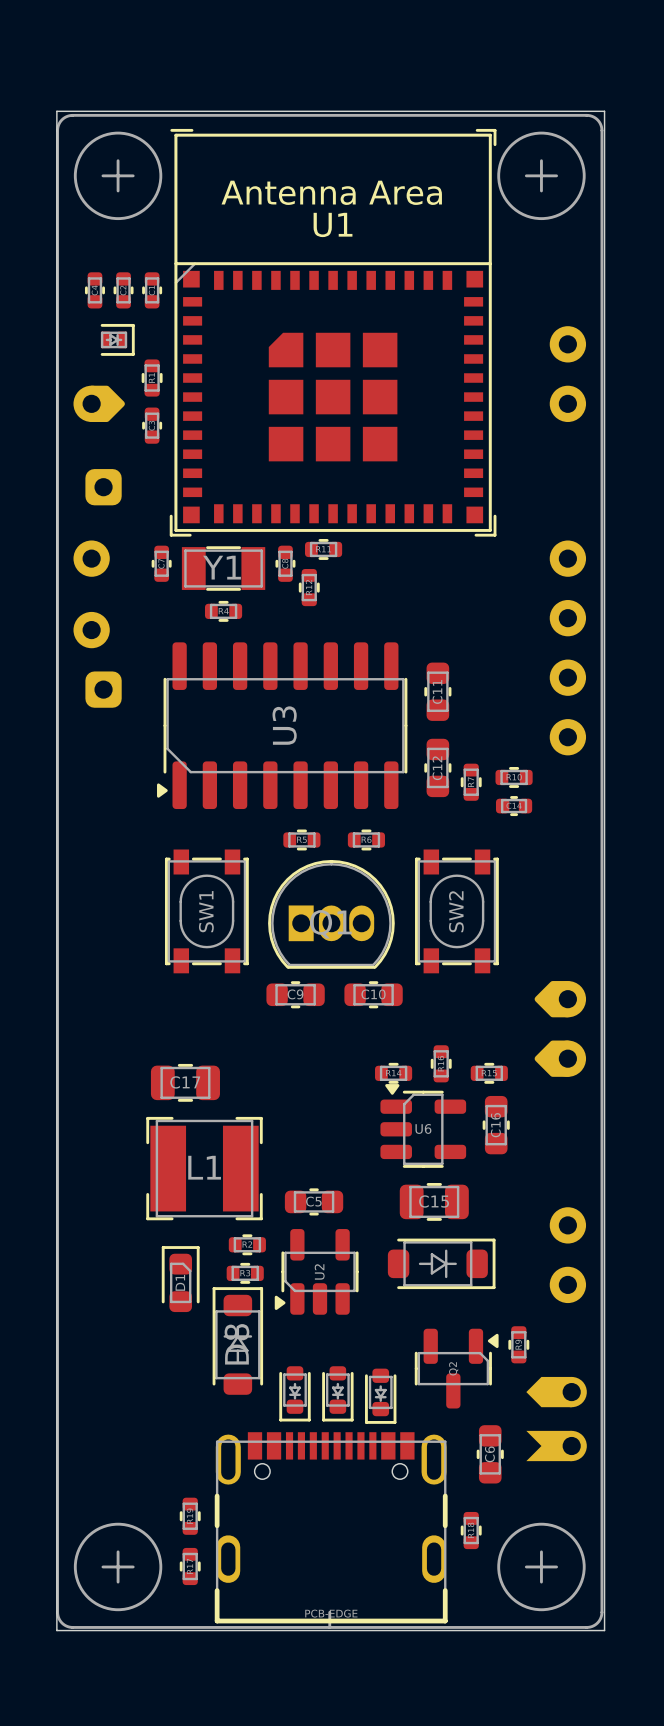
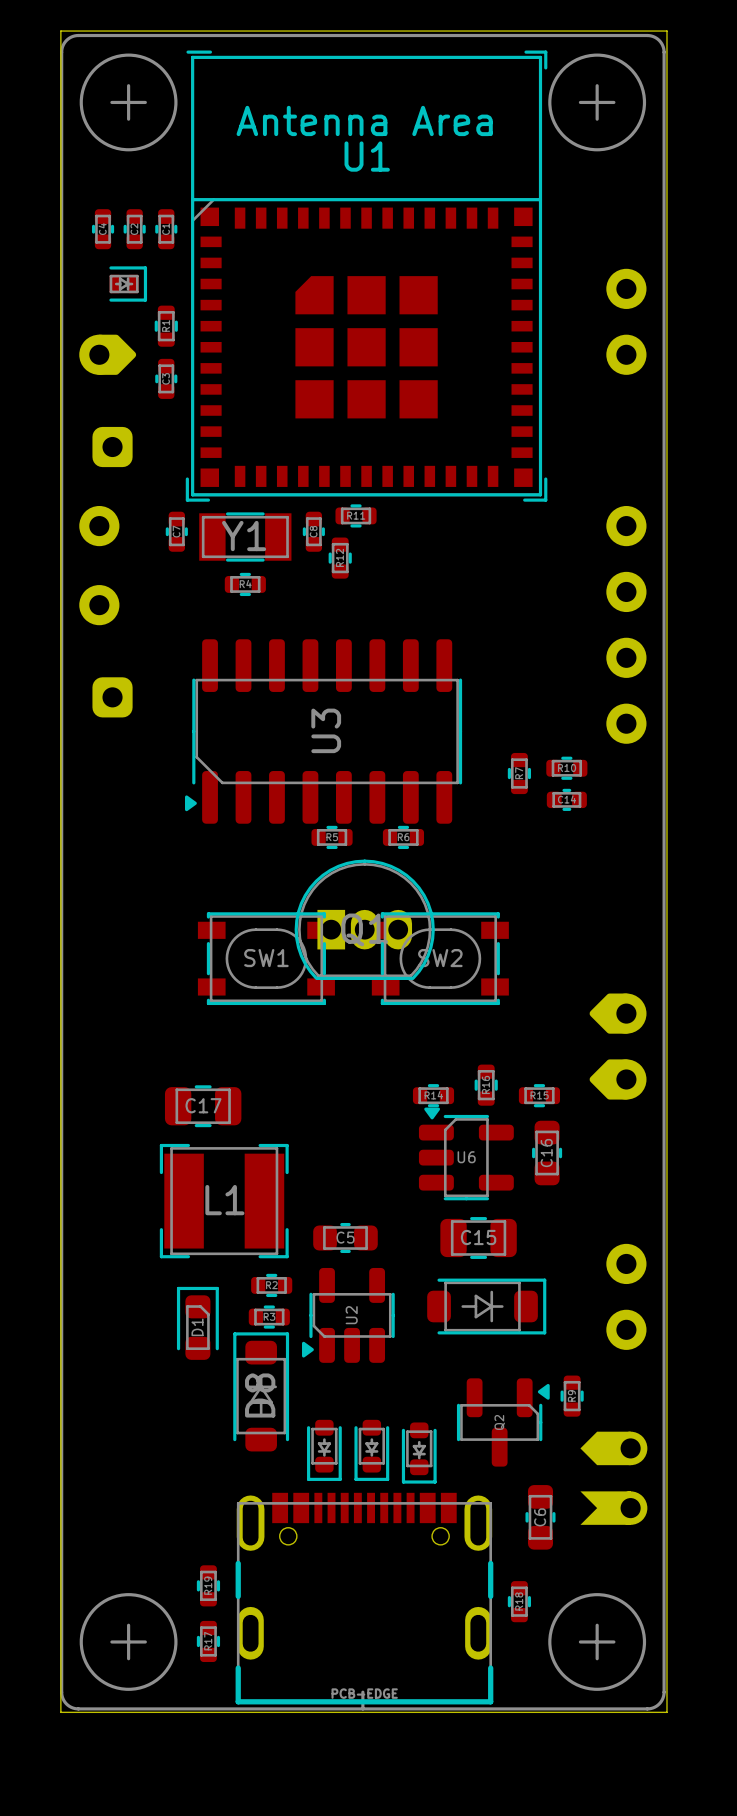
part footprint: [56, 113, 604, 1629] -> [60, 33, 666, 1711]
C11: (437, 691) -> none
U3 position: (282, 725) -> (323, 731)
C12: (437, 767) -> none
SW1 rotation: 0° (206, 911) -> 90° clockwise (266, 958)
SW2 rotation: 0° (456, 911) -> 90° clockwise (440, 958)
C9: (295, 994) -> none
C10: (373, 994) -> none

